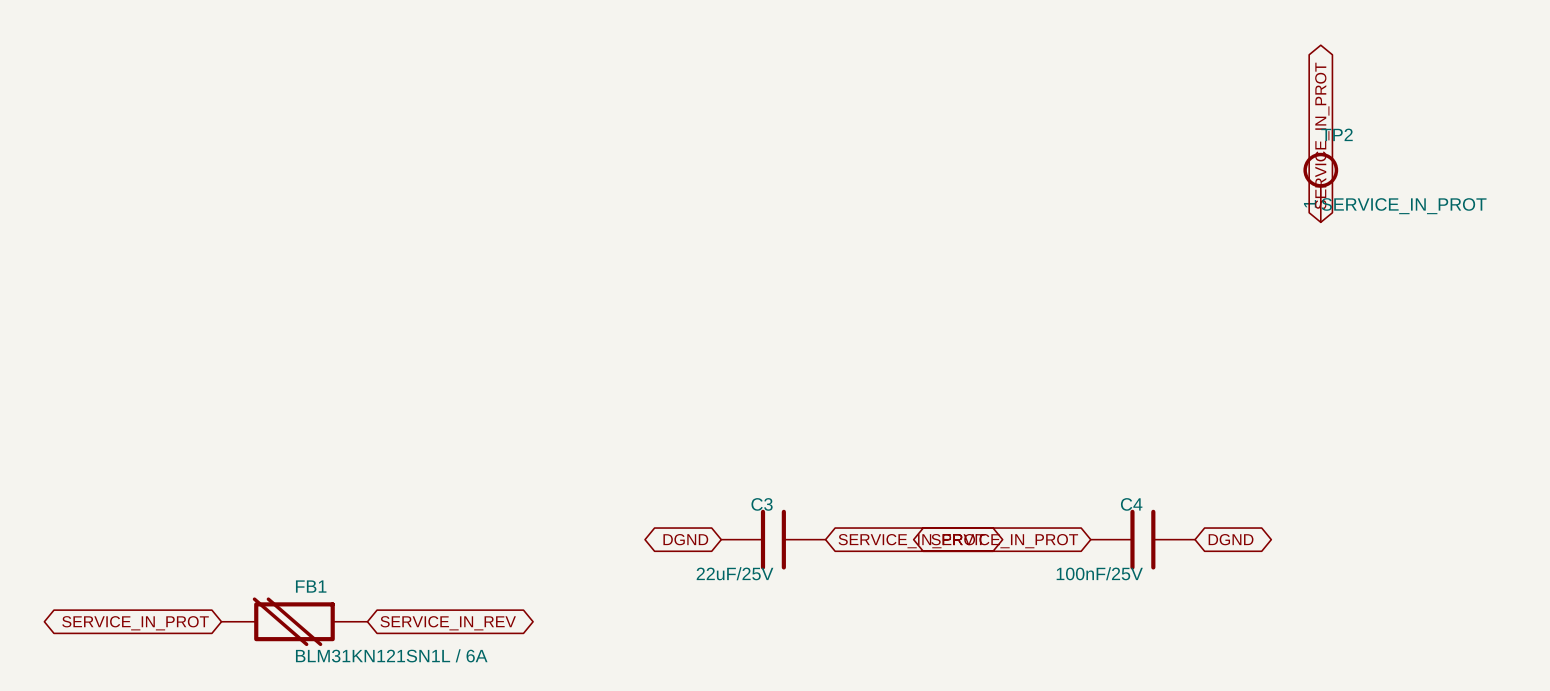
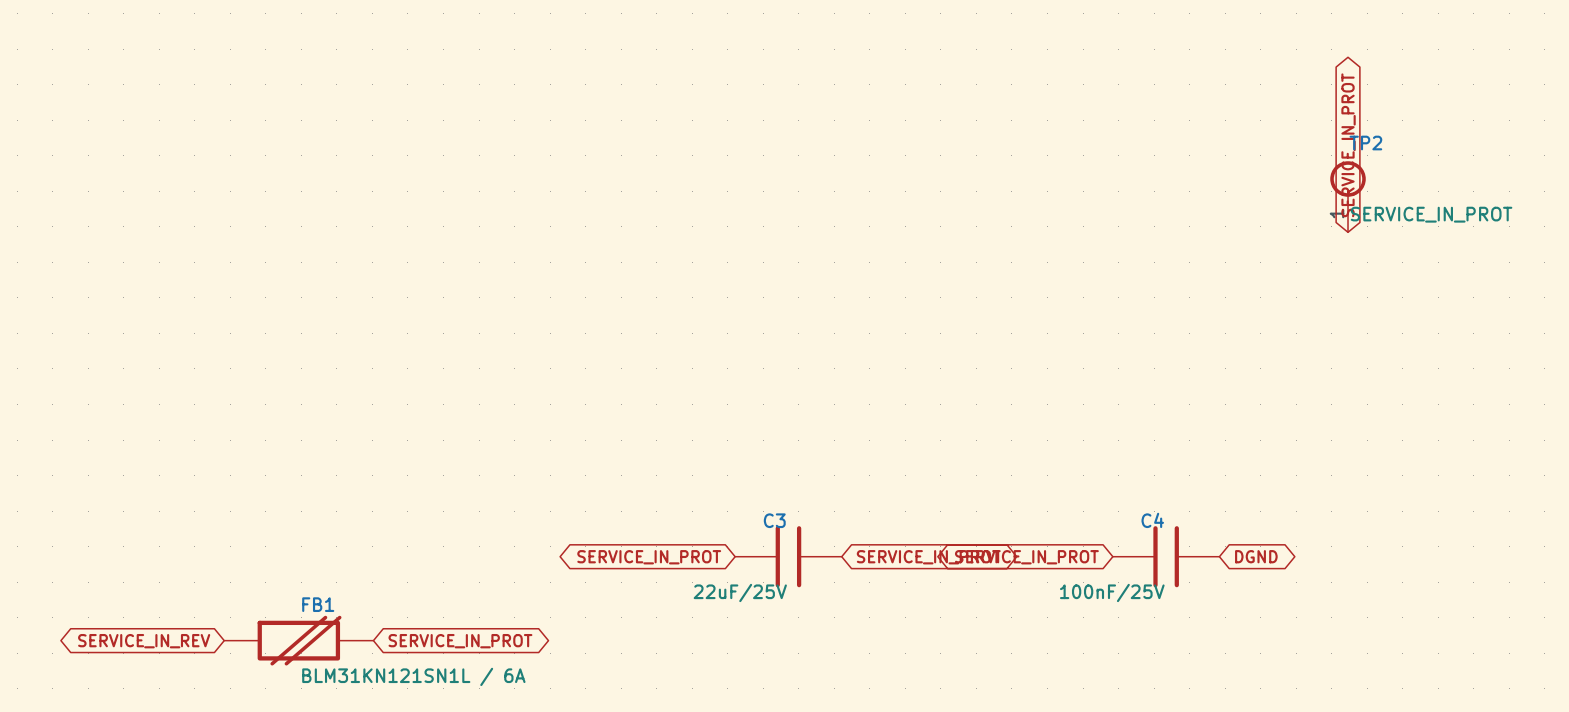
global label: DGND (685, 539) -> SERVICE_IN_PROT (649, 557)
FB1 flip: as is (293, 621) -> left-right (299, 640)
global label: SERVICE_IN_PROT (135, 623) -> SERVICE_IN_REV (144, 641)
global label: SERVICE_IN_REV (448, 623) -> SERVICE_IN_PROT (460, 641)

